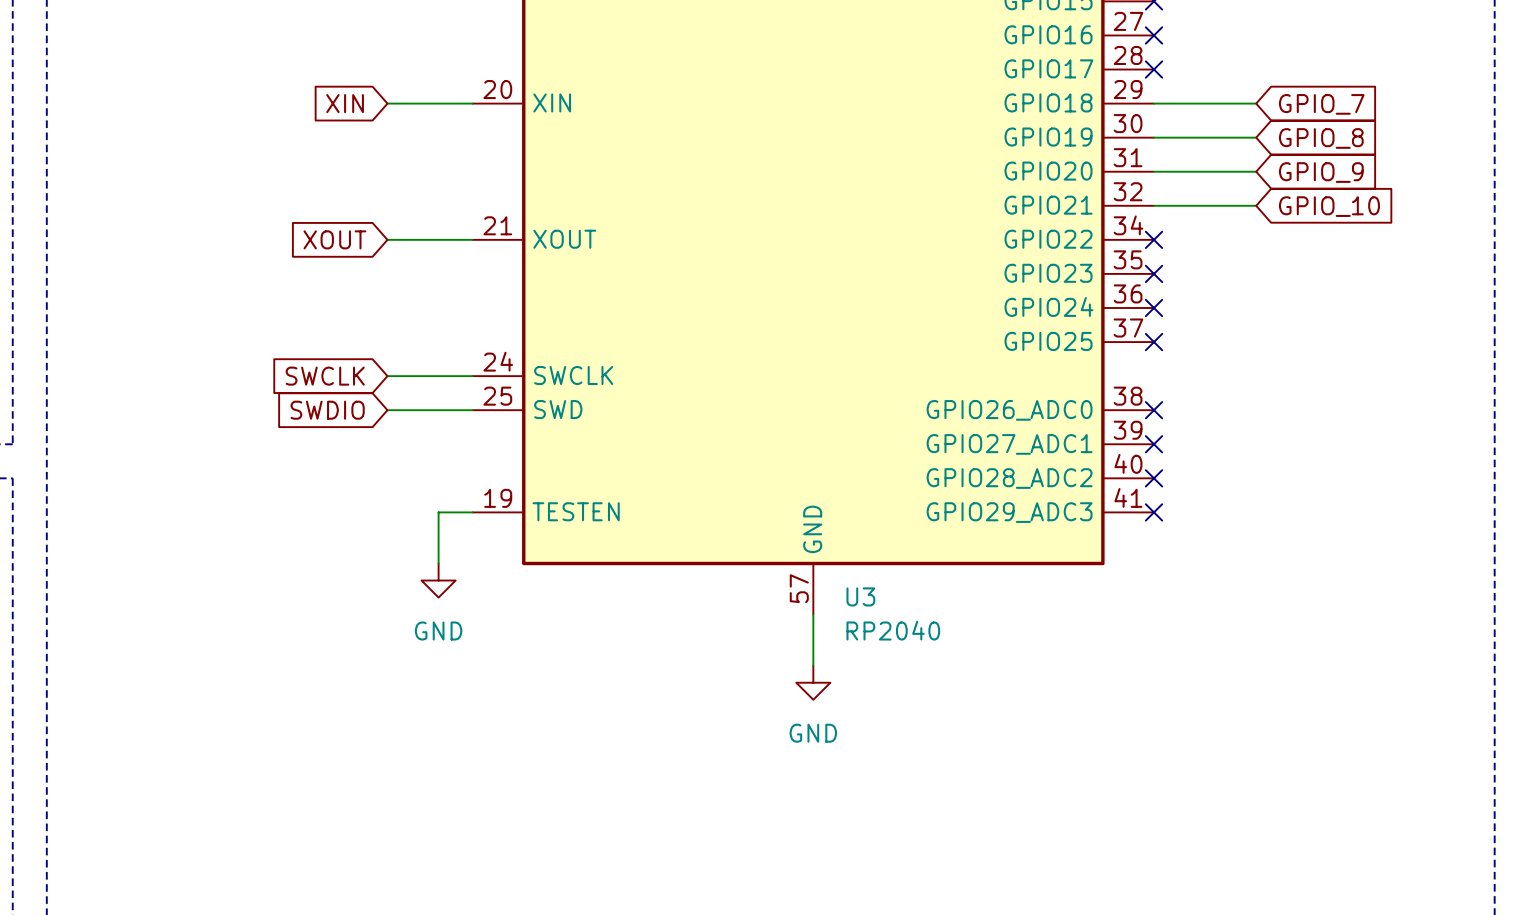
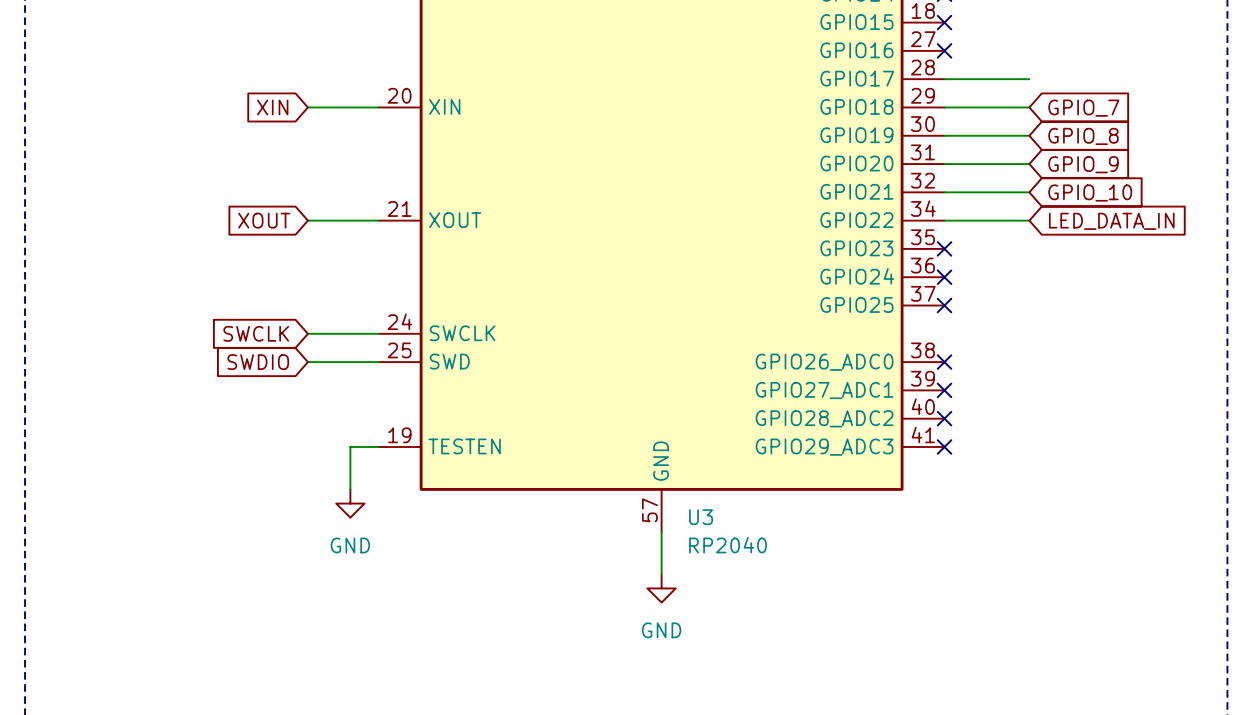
wire: none -> (944, 79) (1029, 79)
no-connect mark: (1154, 69) -> none
wire: none -> (944, 220) (1029, 220)
no-connect mark: (1154, 239) -> none
global label: none -> LED_DATA_IN (1111, 221)

